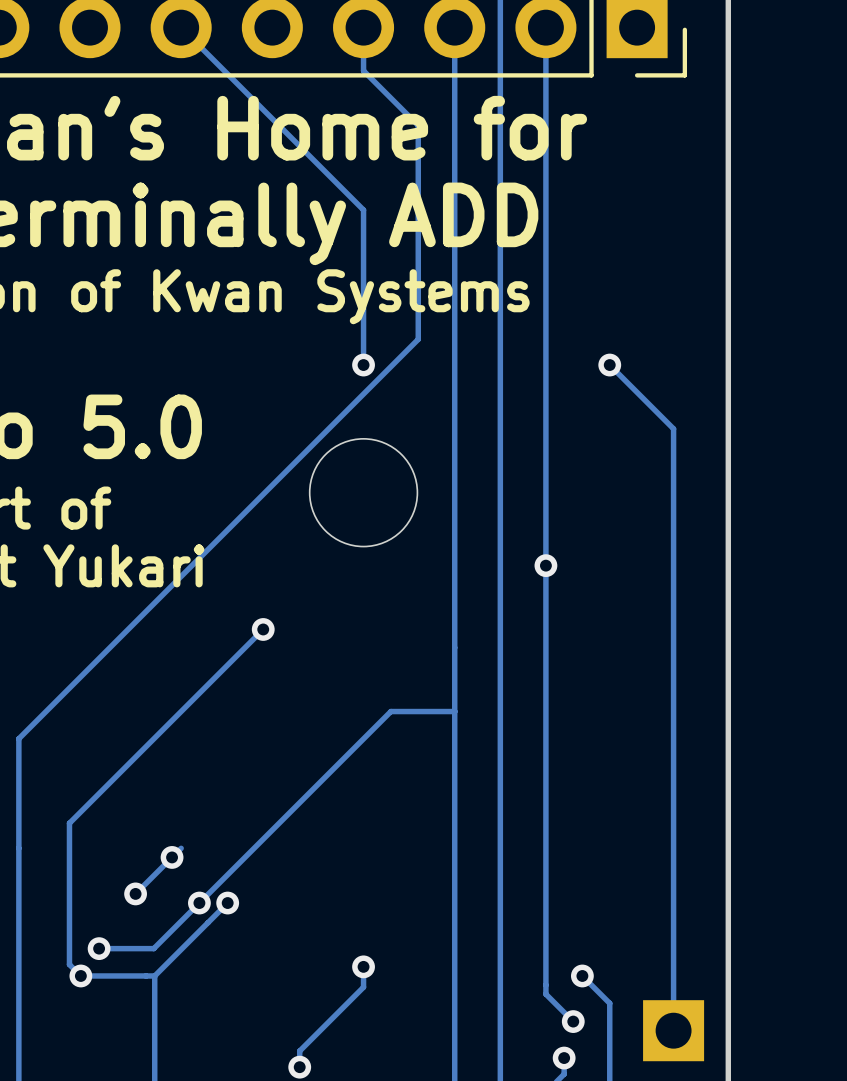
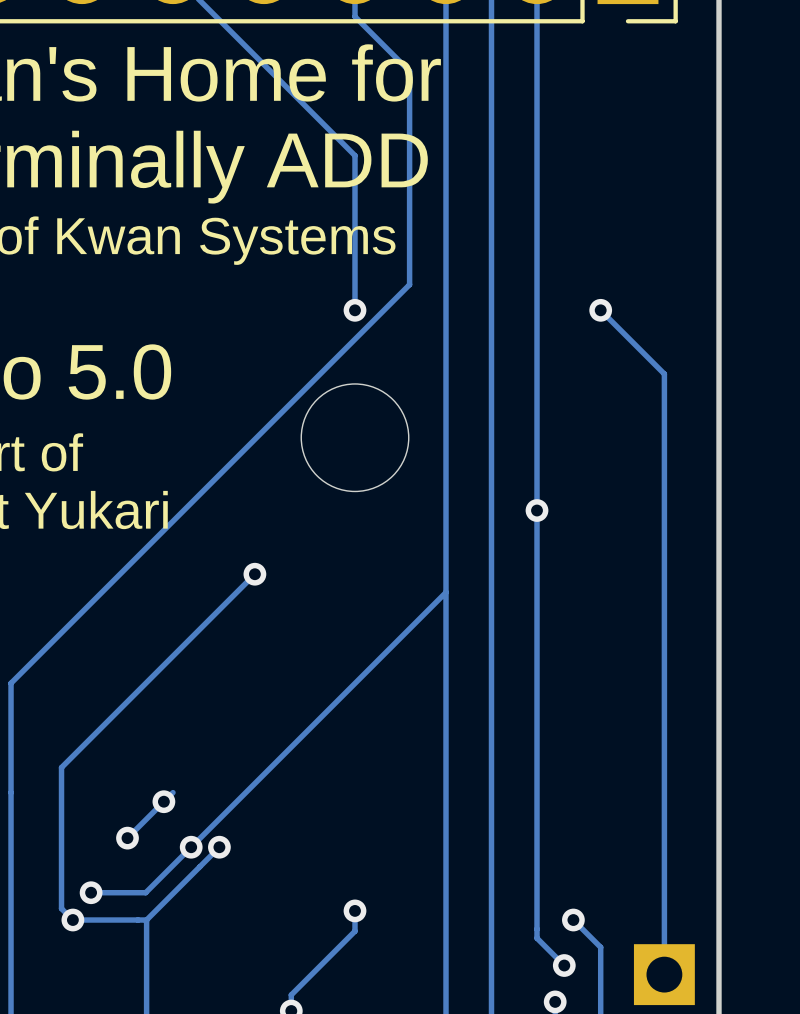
track: (454, 711) (390, 711) -> (446, 592) (382, 656)

